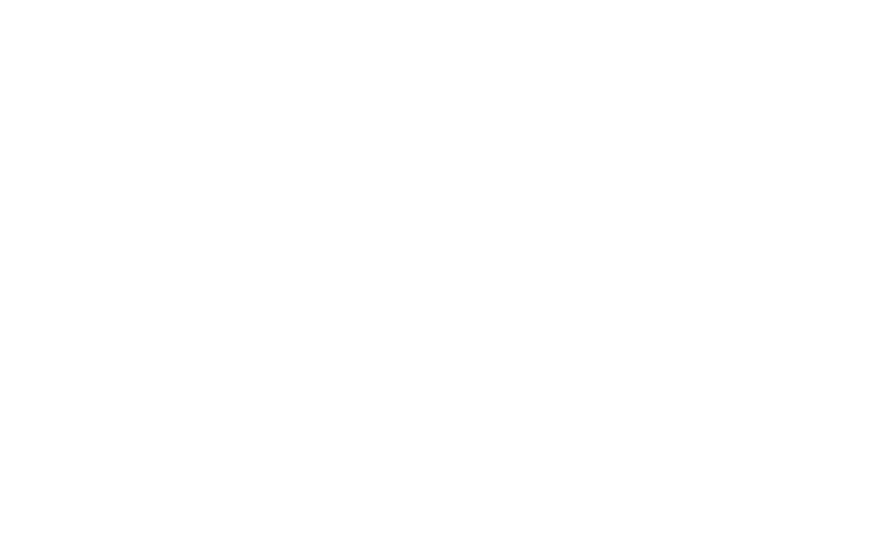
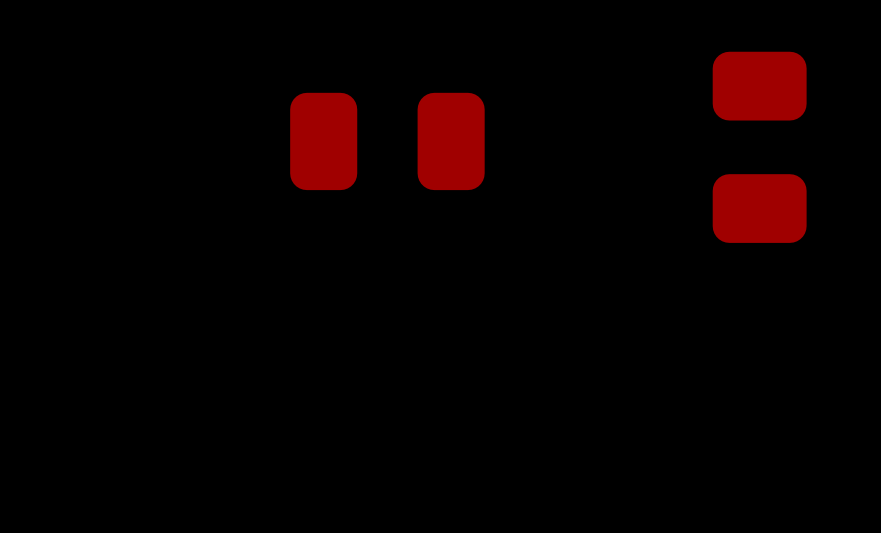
part: none -> (387, 141)
part: none -> (759, 147)

